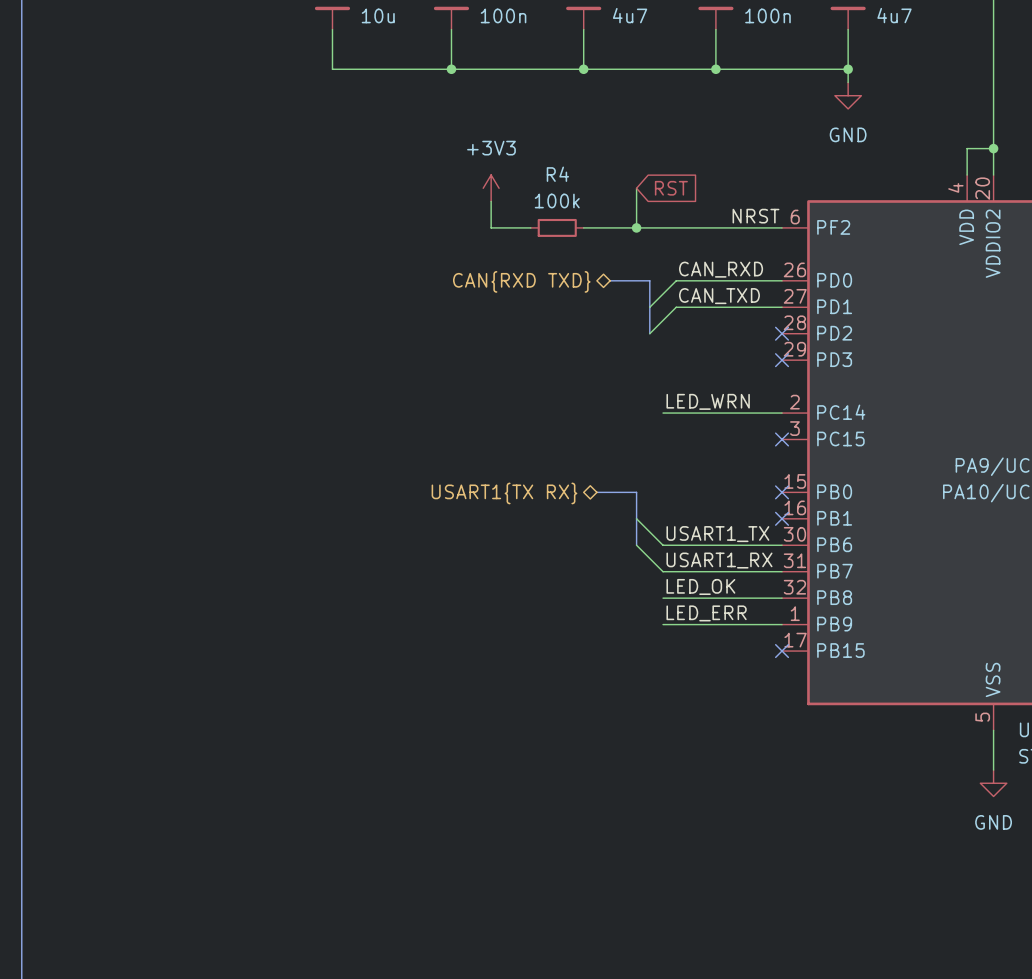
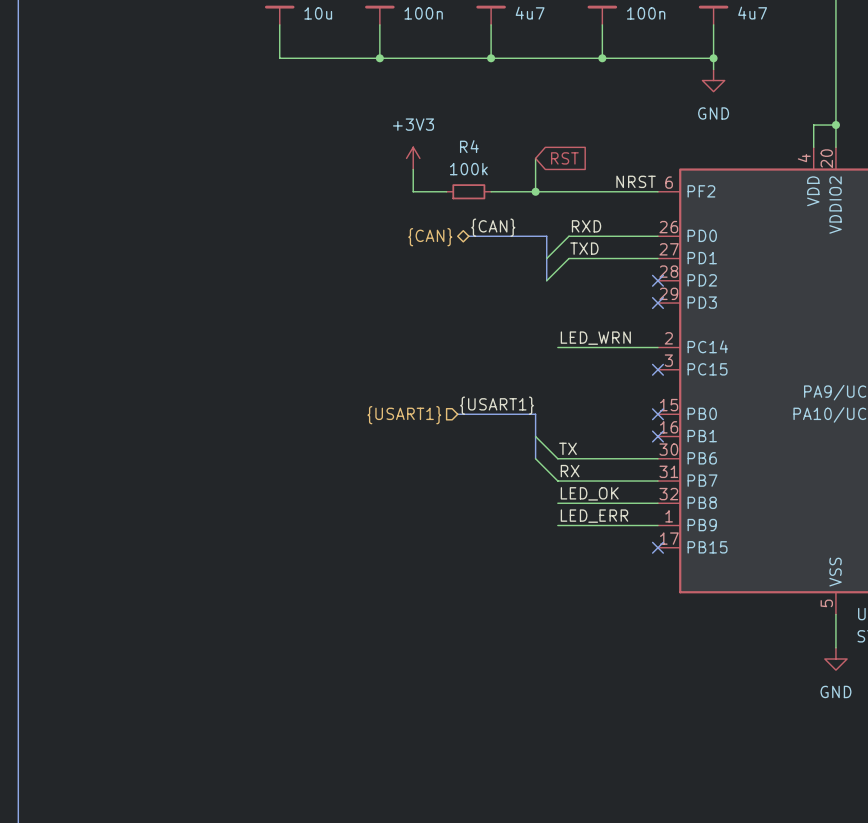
label: CAN_RXD (721, 269) -> RXD (586, 226)
label: none -> {CAN} (493, 227)
bus: none -> (468, 236) (513, 236)
hierarchical label: none -> {CAN} (430, 237)
hierarchical label: CAN{RXD TXD} (521, 281) -> none
label: CAN_TXD (719, 296) -> TXD (584, 248)
label: none -> {USART1} (497, 405)
bus: none -> (457, 414) (502, 414)
hierarchical label shape: bidirectional (504, 493) -> input (404, 415)
hierarchical label: USART1{TX RX} (504, 493) -> {USART1} (404, 415)
label: USART1_TX (717, 534) -> TX (567, 448)
label: USART1_RX (719, 560) -> RX (570, 471)

